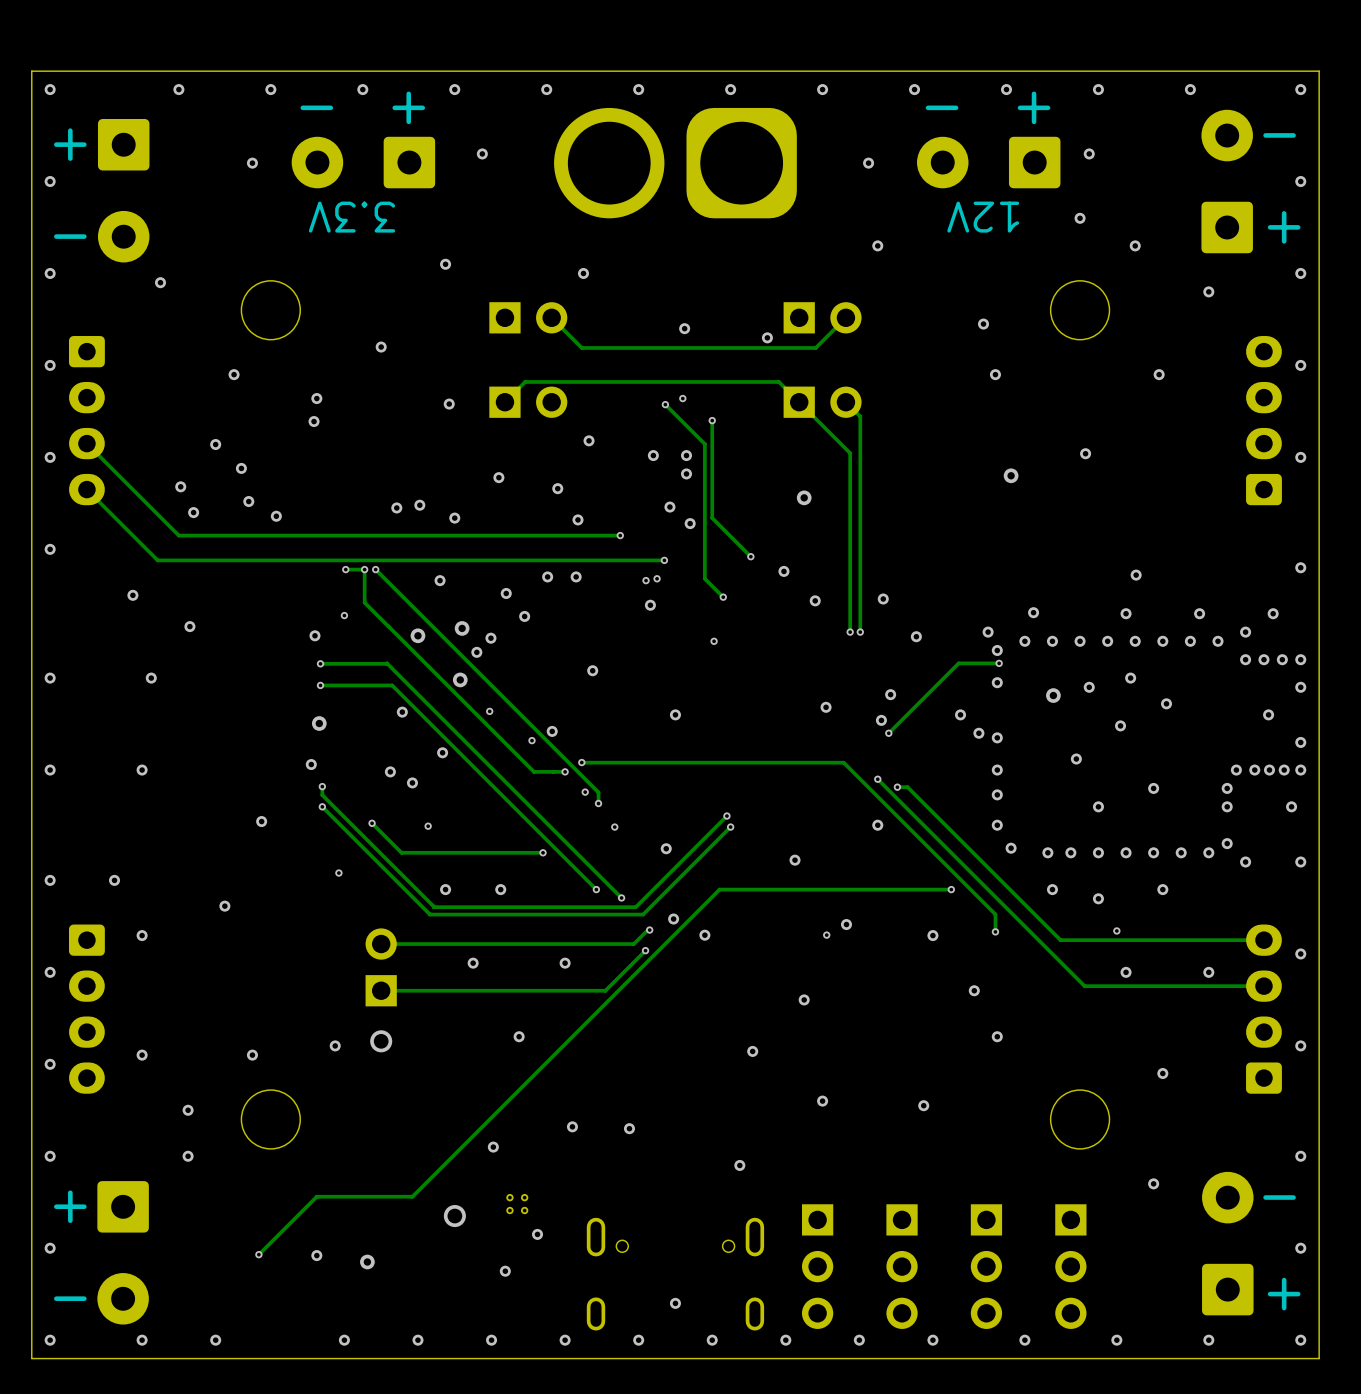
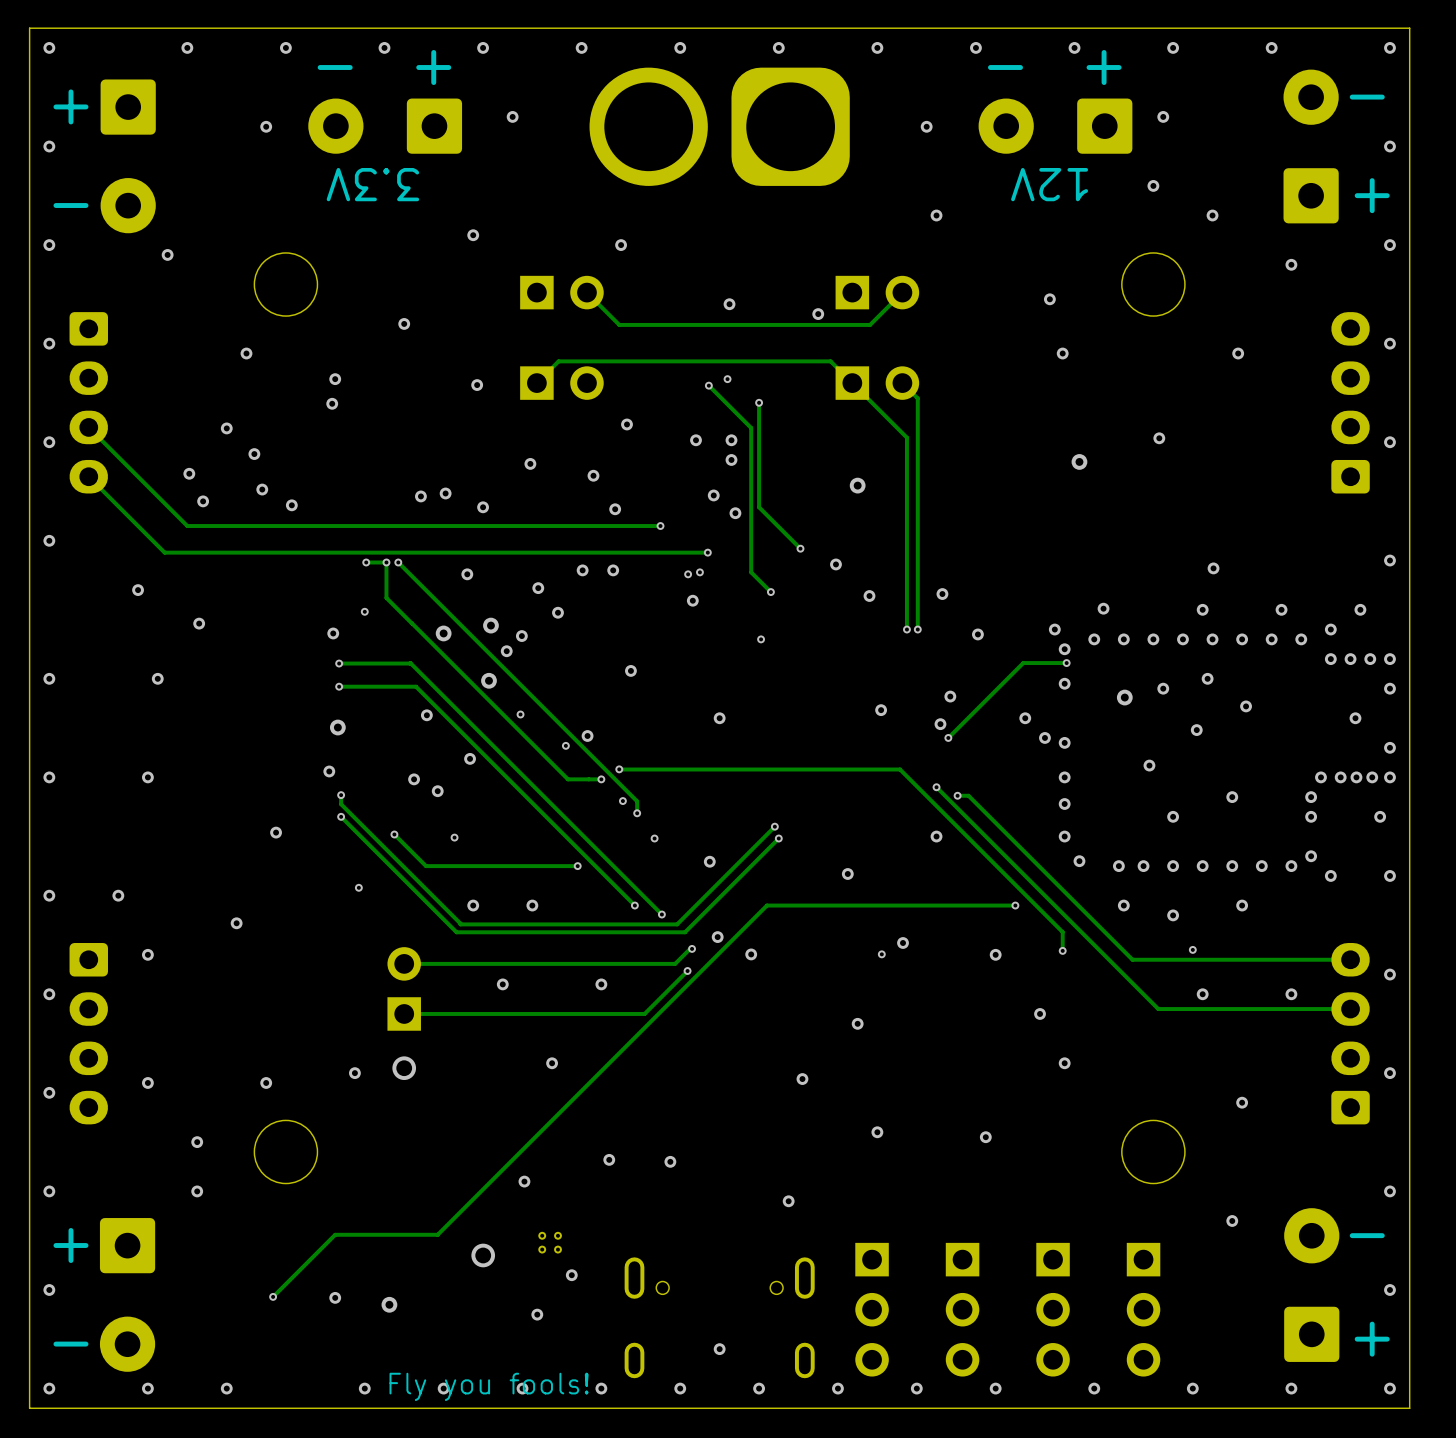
text: none -> Fly you fools! (489, 1386)

